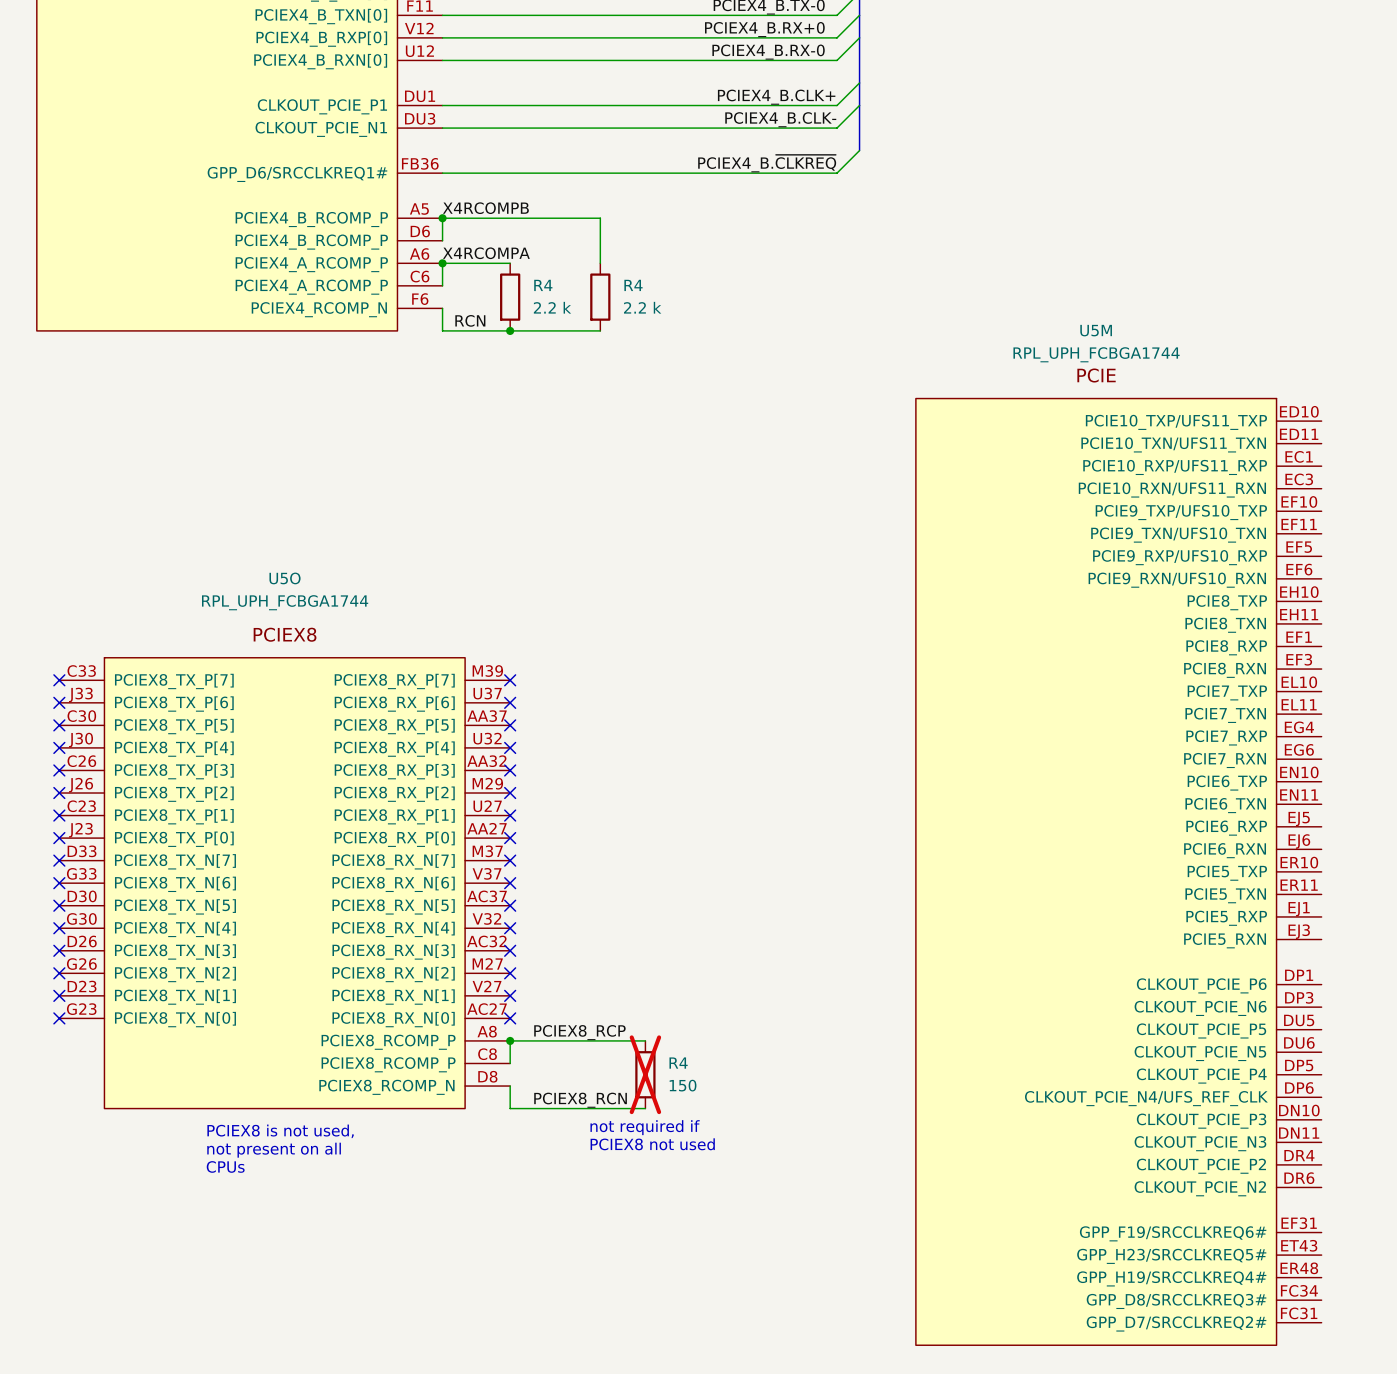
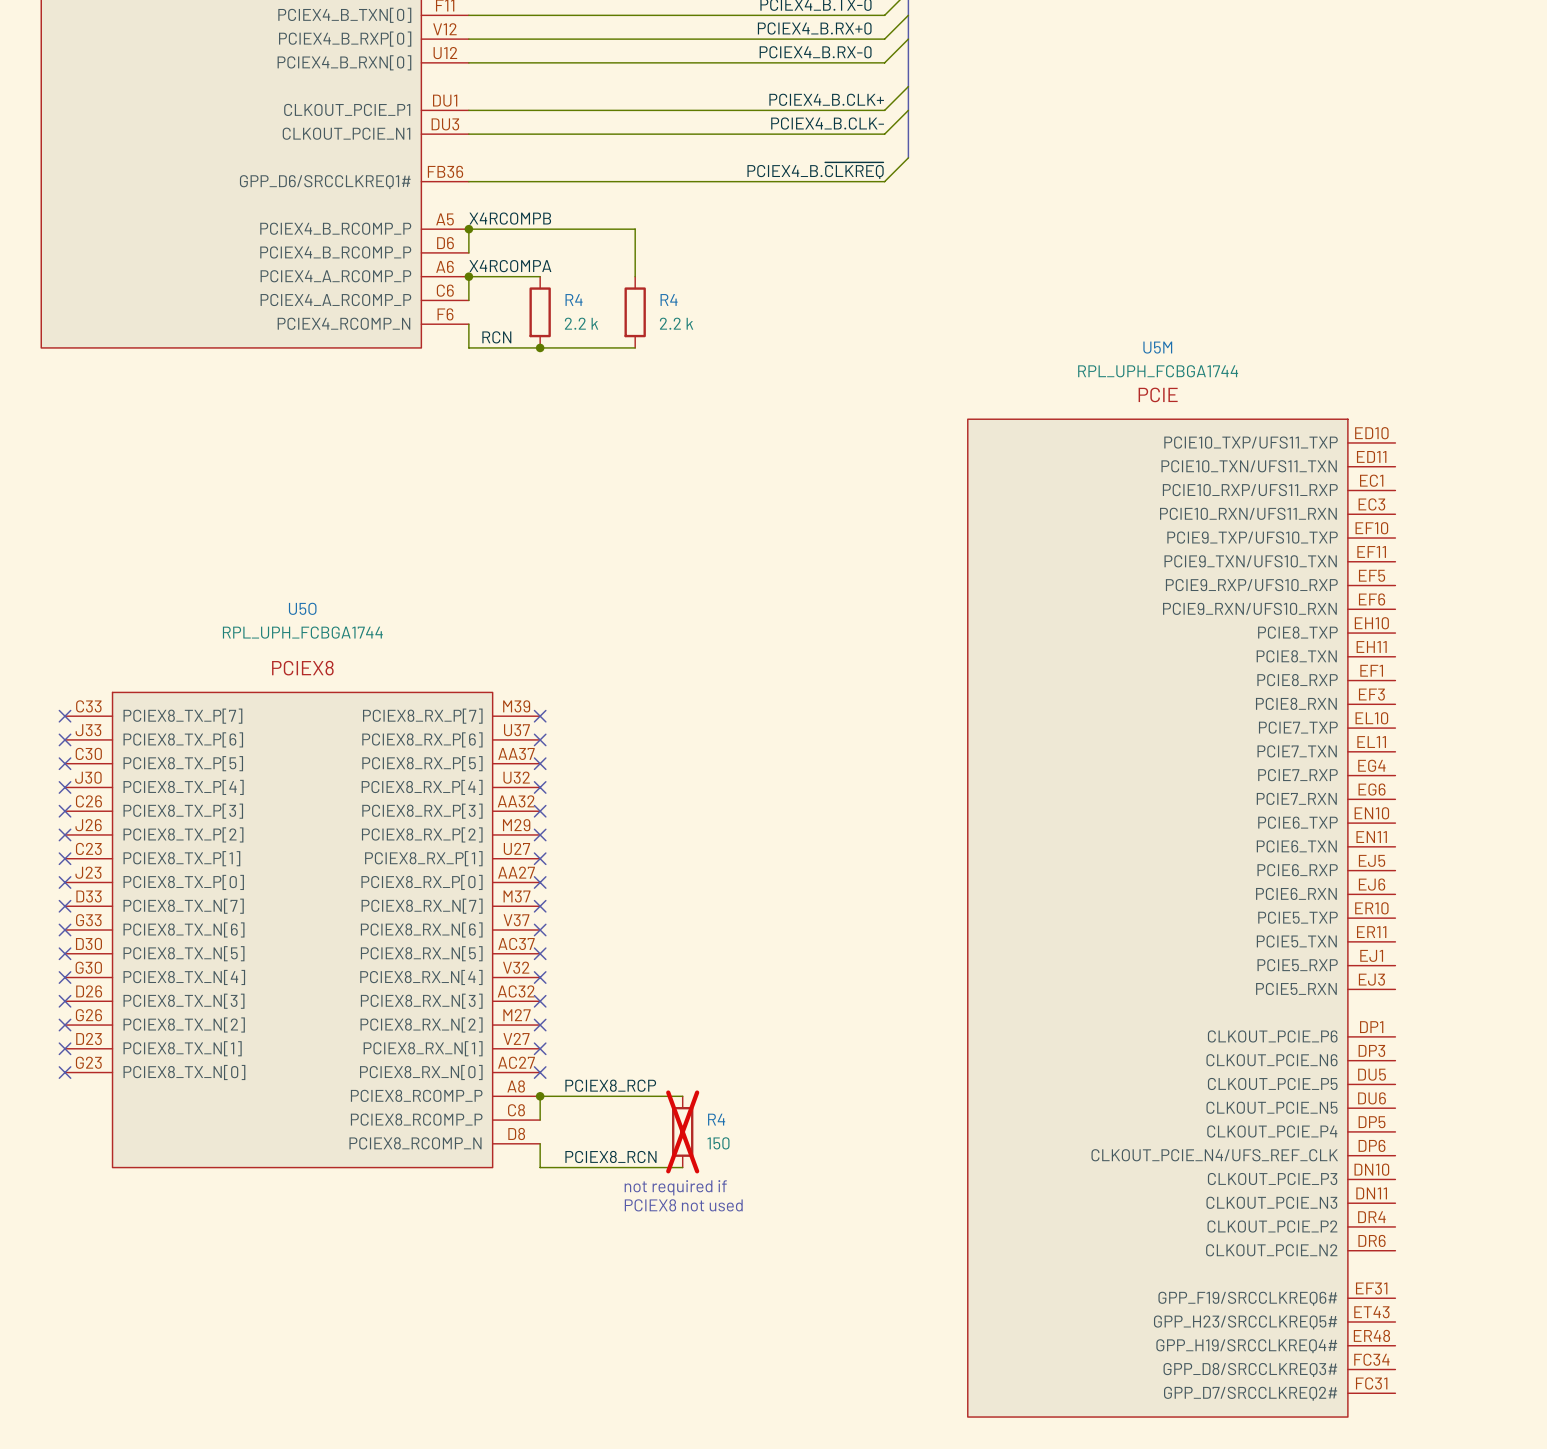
text: PCIEX8 is not used, (280, 1131) -> none
text: not present on all (274, 1150) -> none
text: CPUs (225, 1166) -> none

